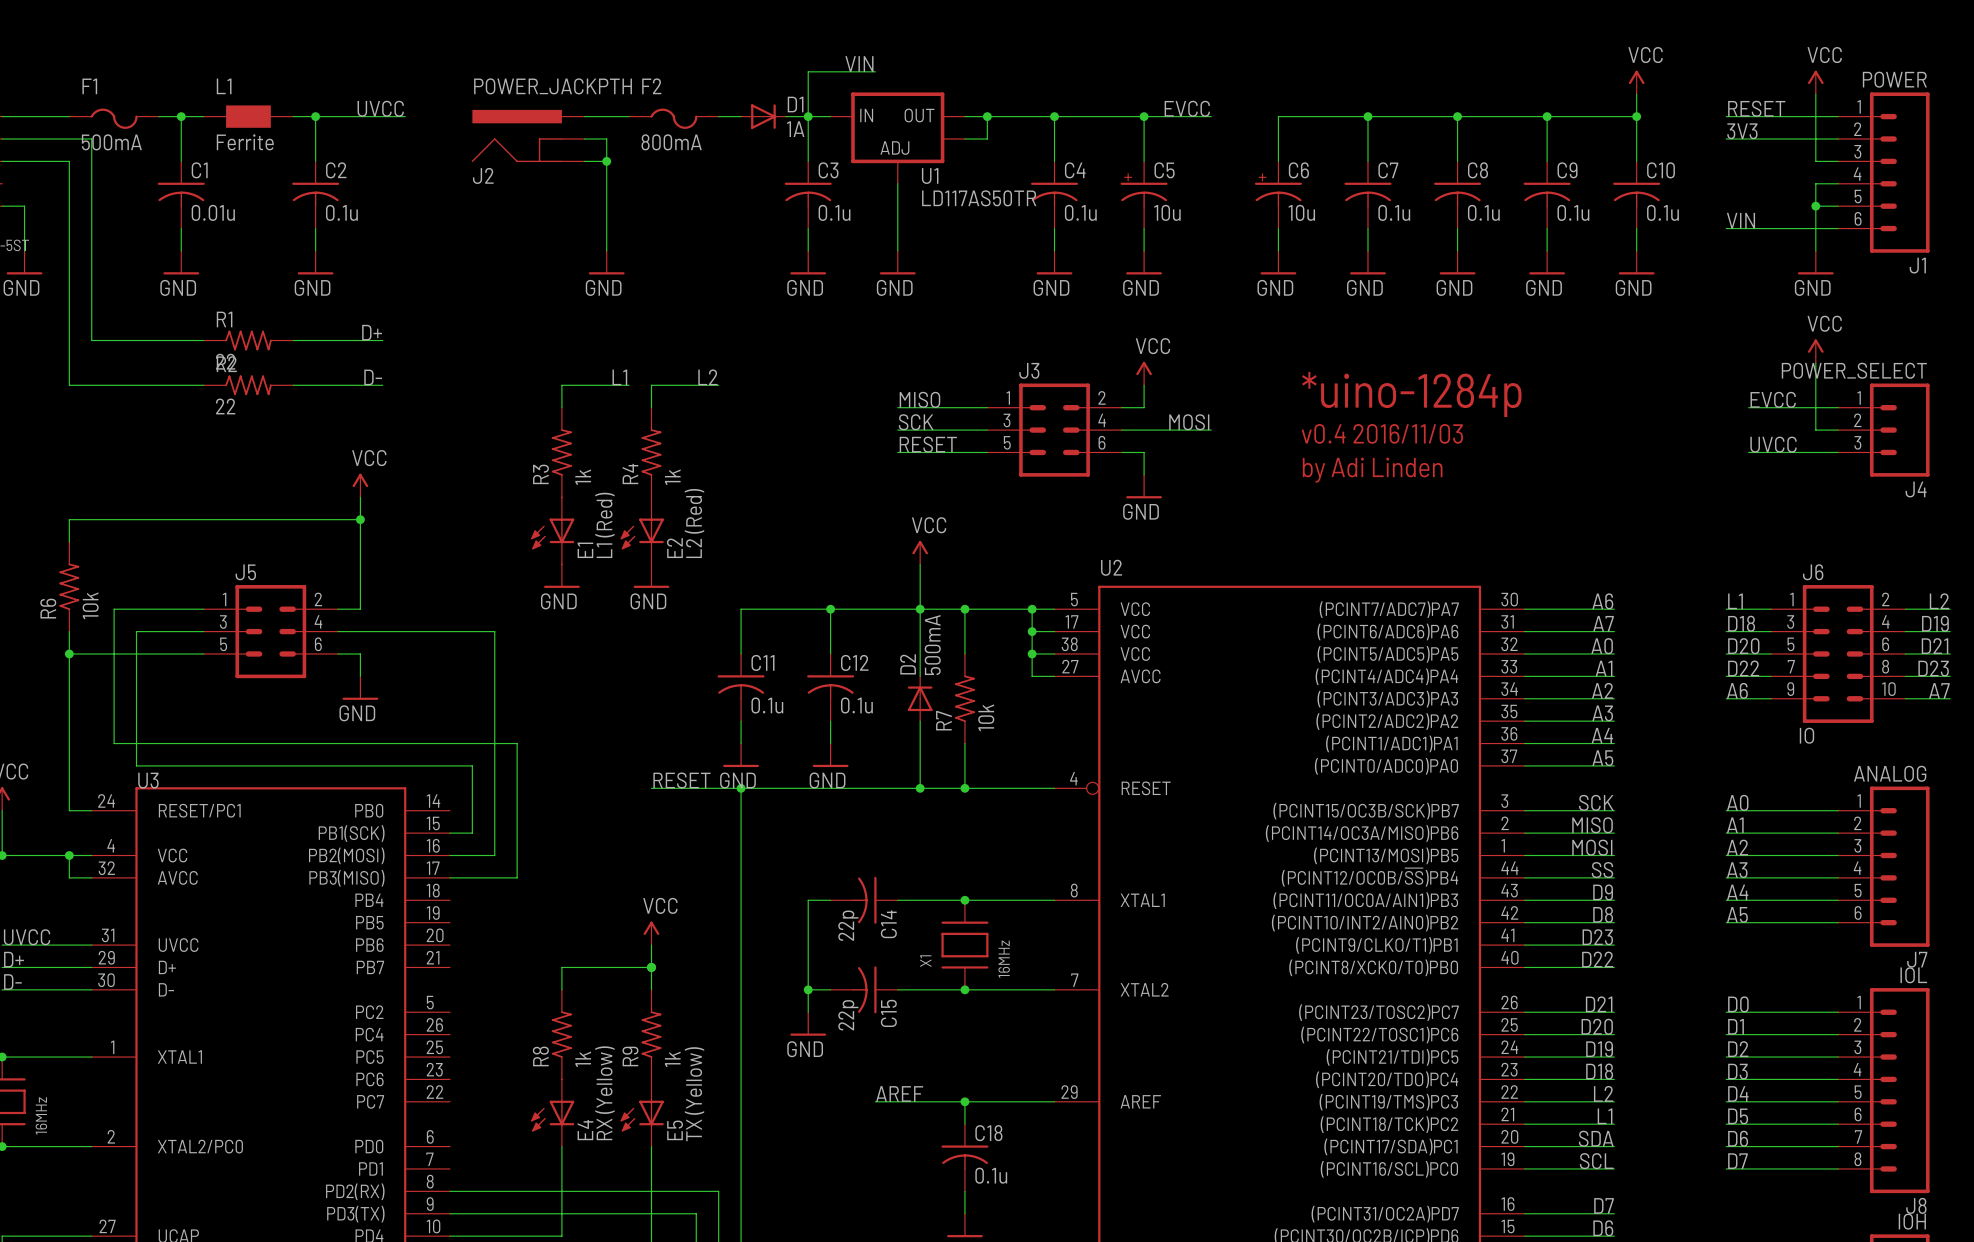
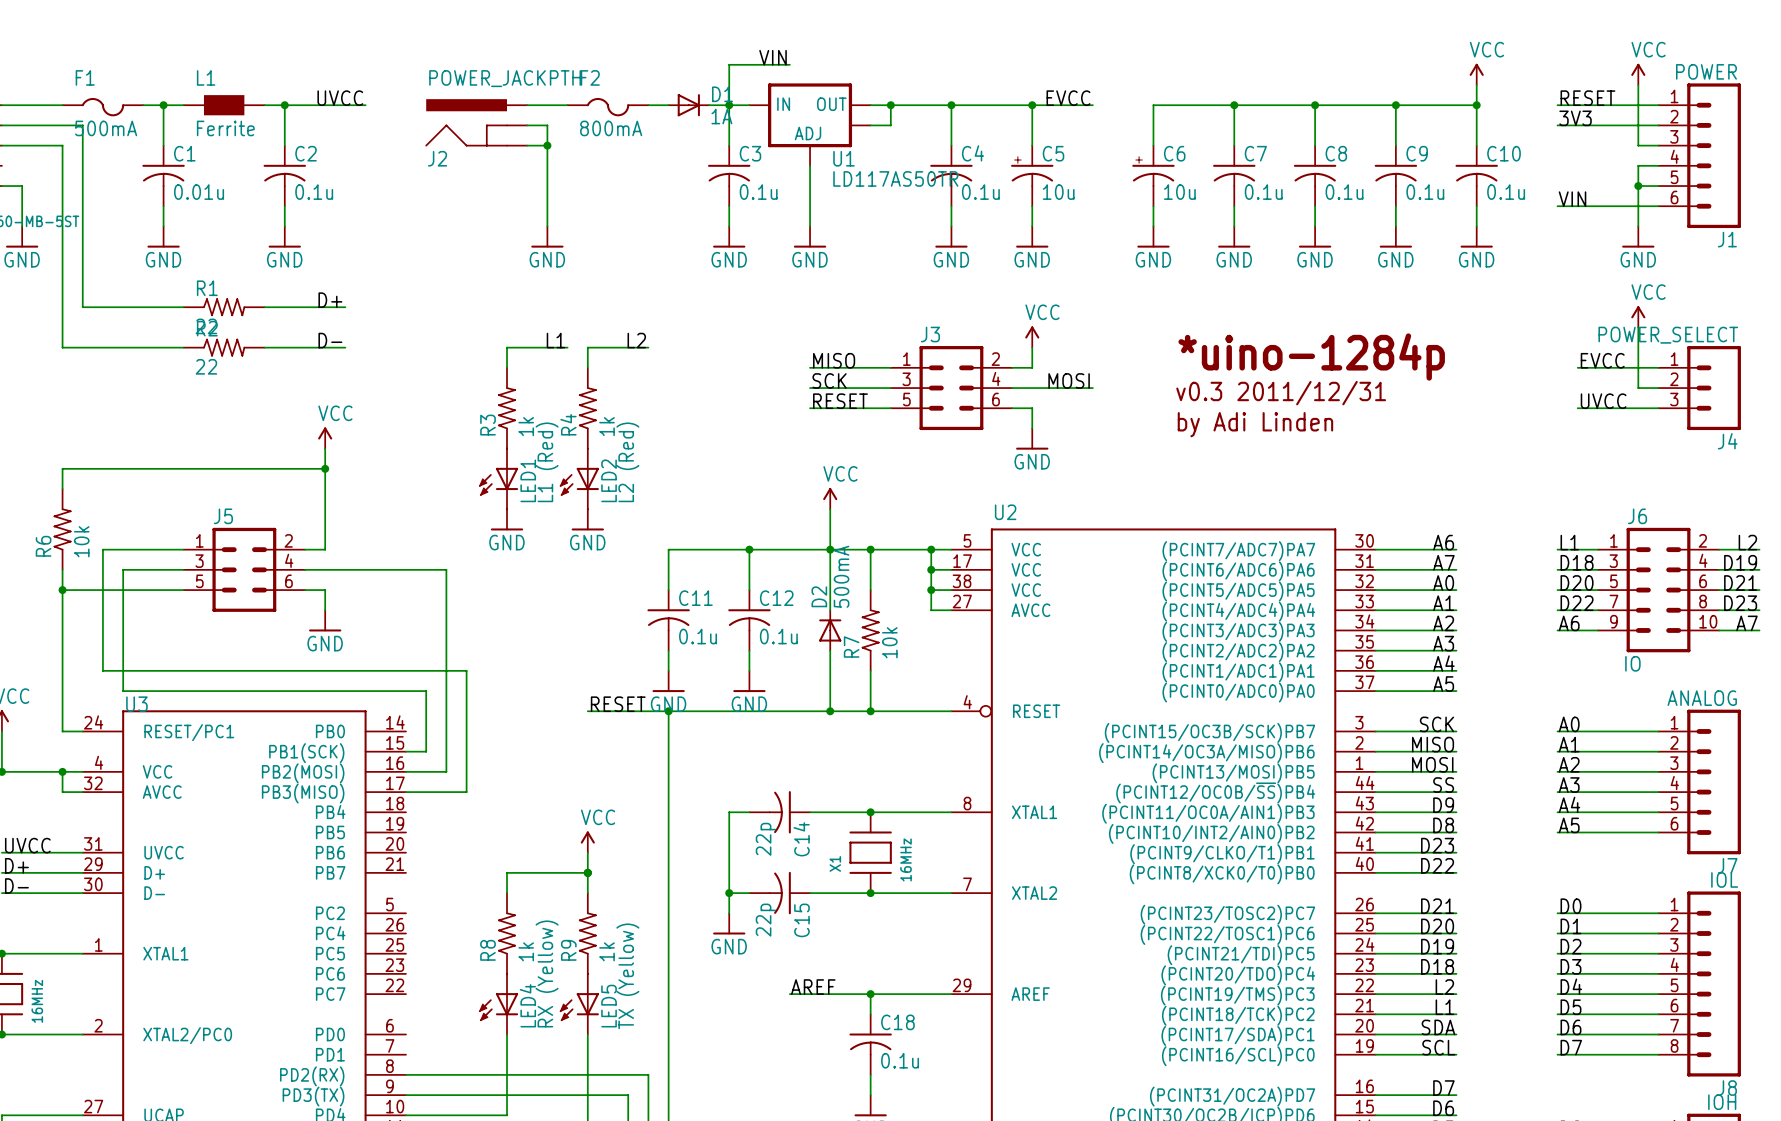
text: v0.4 2016/11/03 (1382, 433) -> v0.3 2011/12/31 (1281, 393)
E2 name: E2 (674, 548) -> LED2 (609, 480)
E1 name: E1 (585, 550) -> LED1 (528, 480)
E4 name: E4 (585, 1130) -> LED4 (527, 1005)
E5 name: E5 (675, 1130) -> LED5 (609, 1006)

